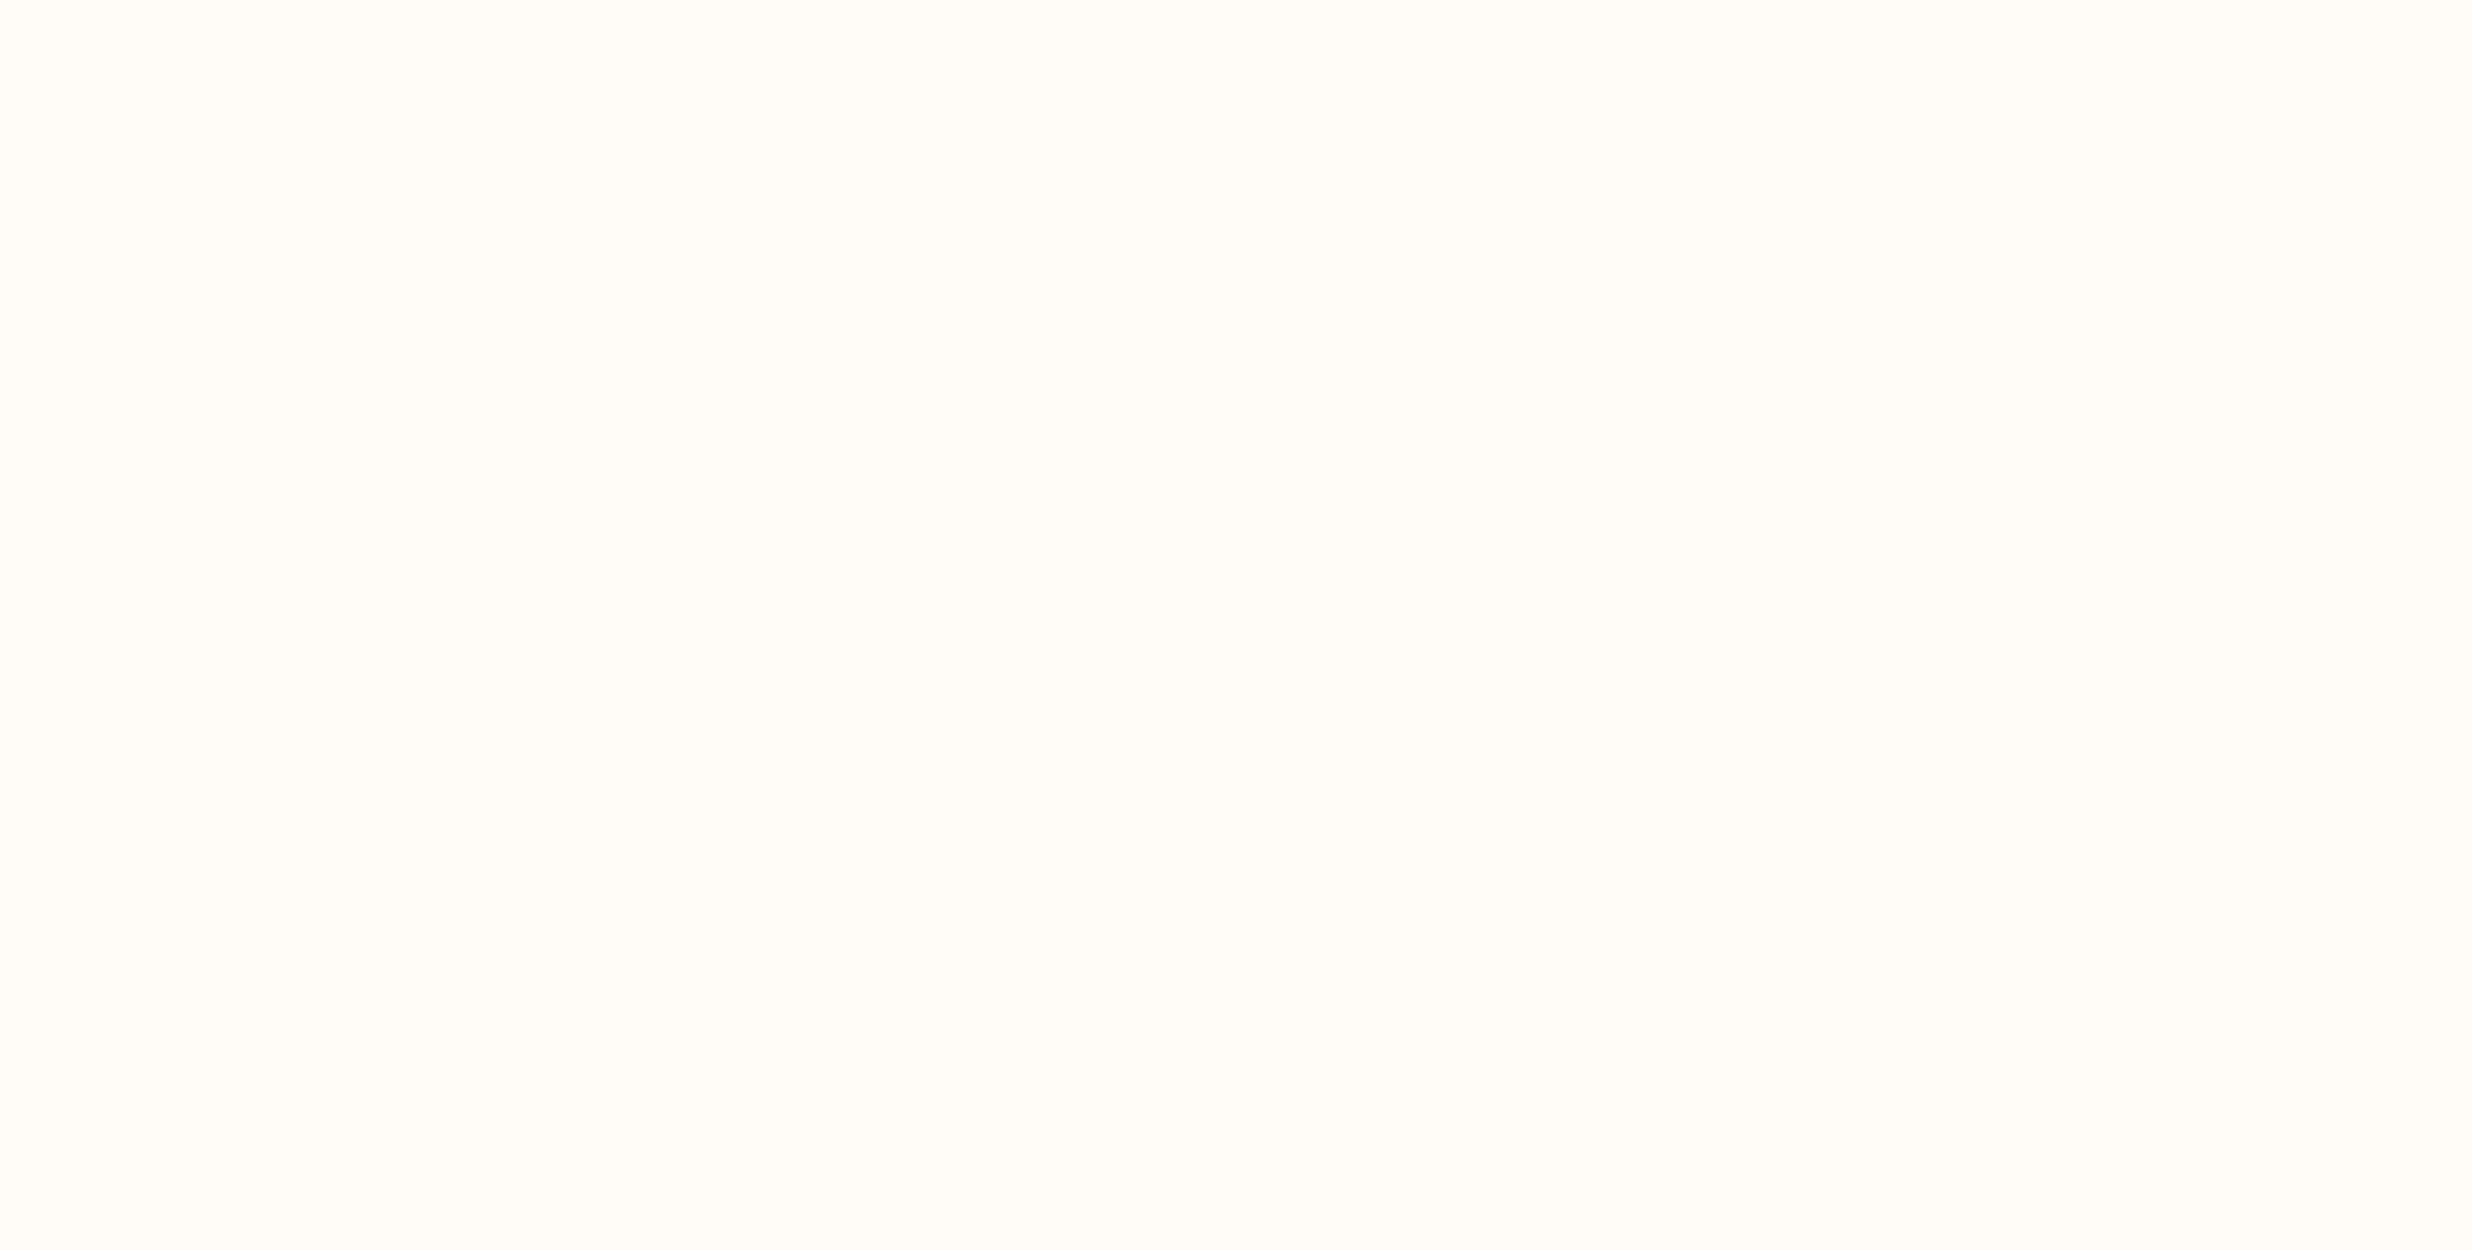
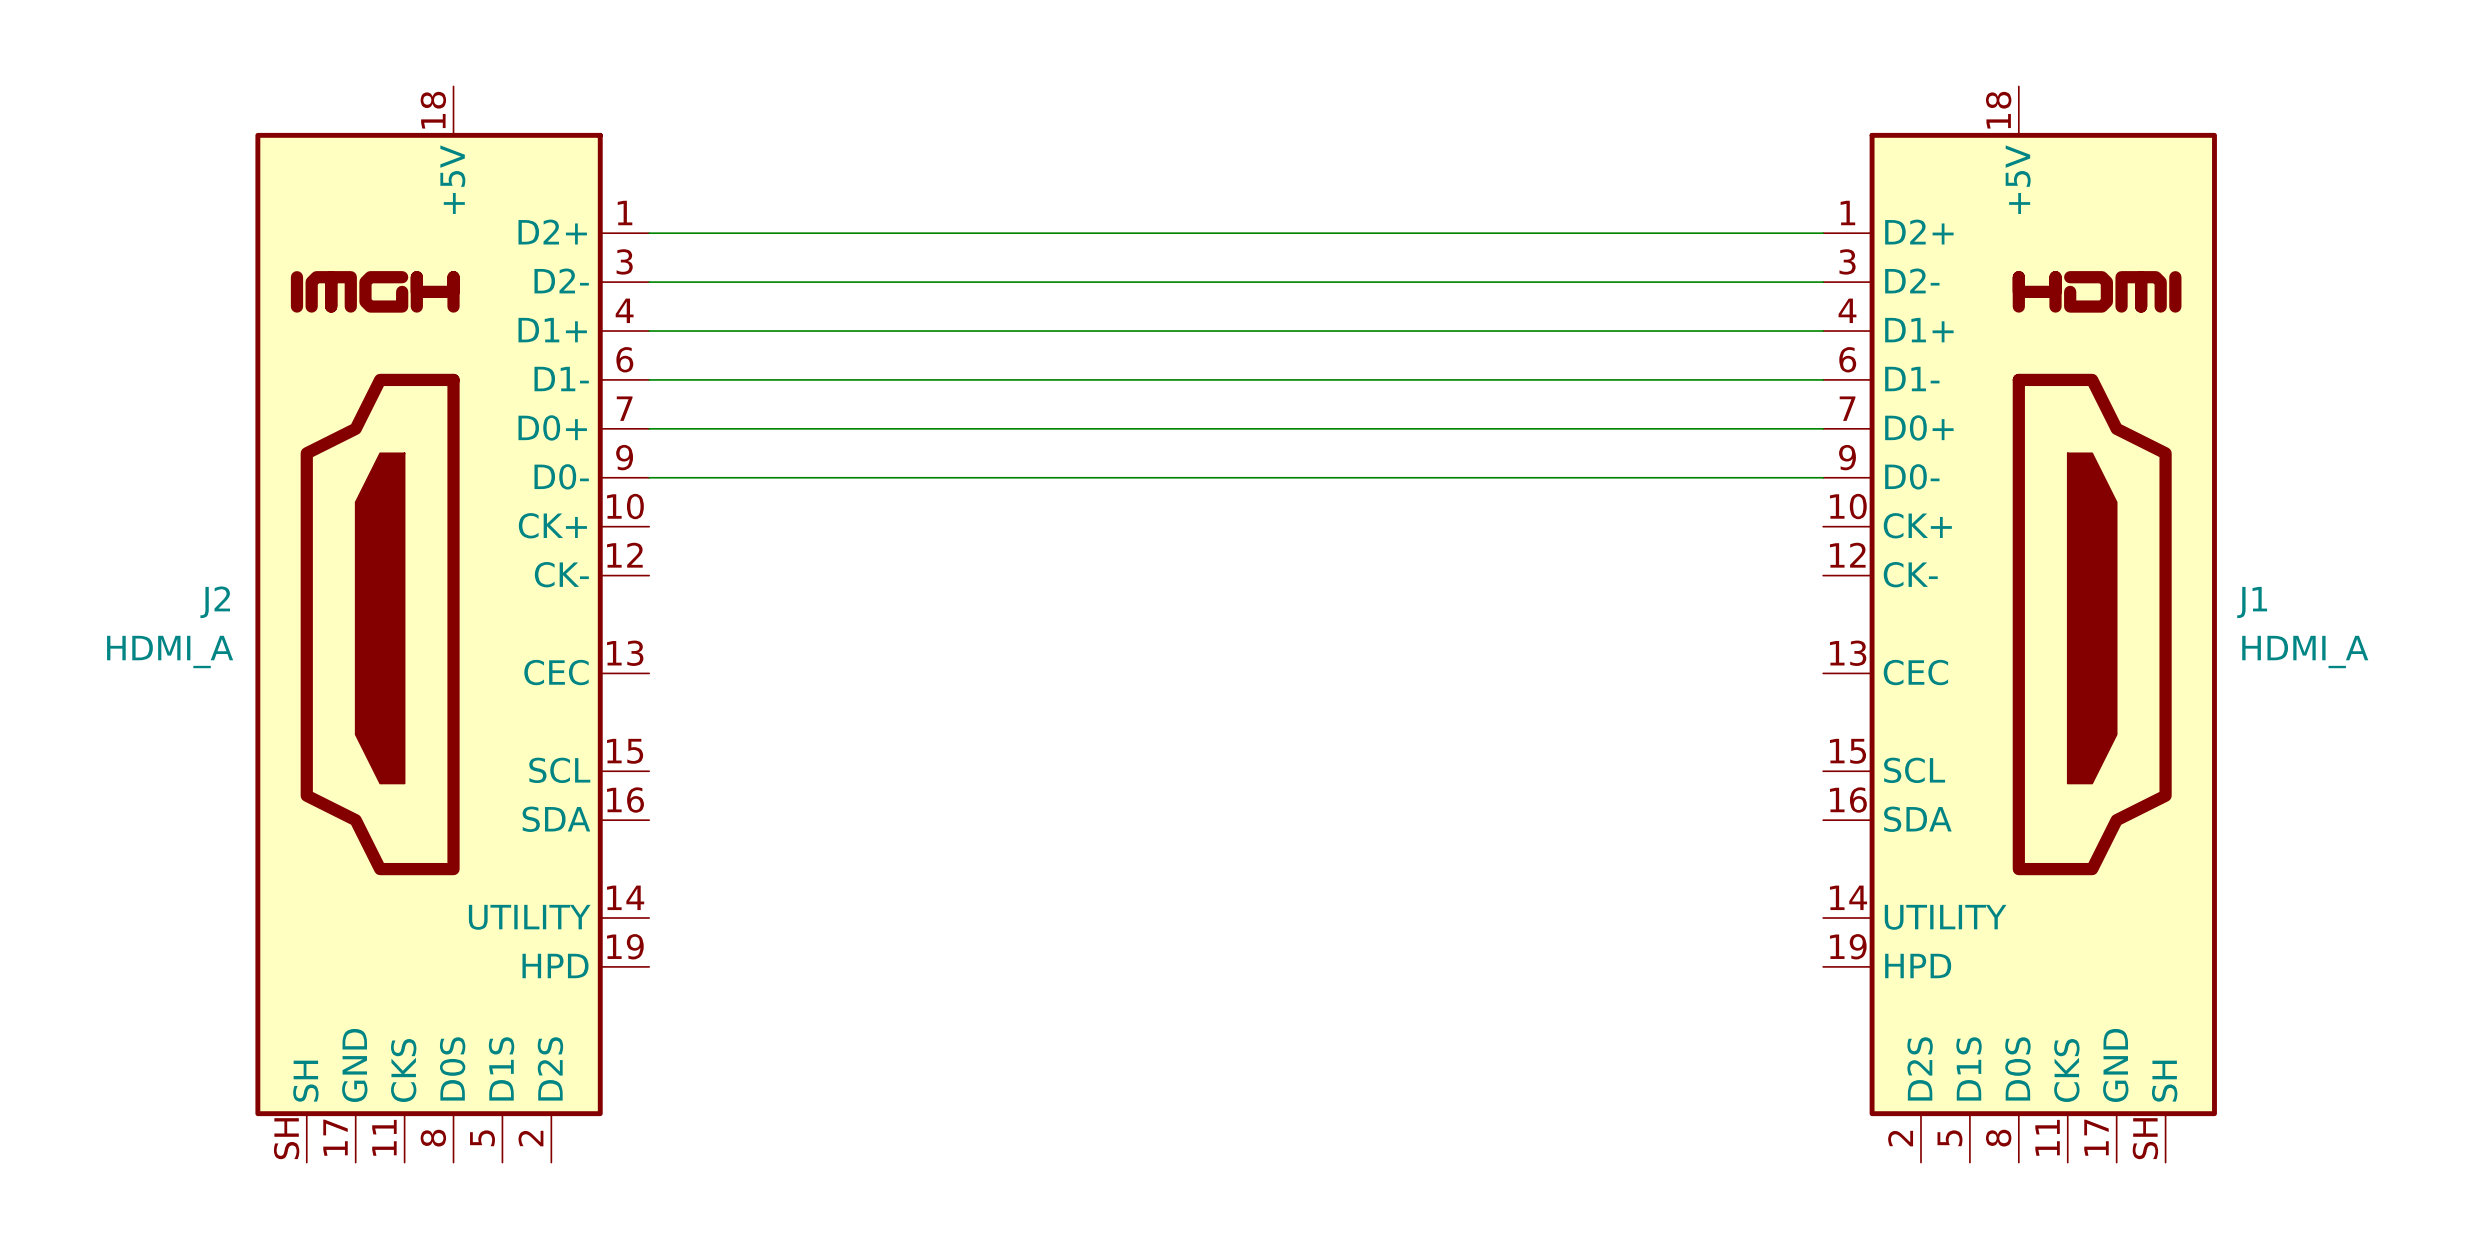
wire: none -> (649, 233) (1823, 233)
wire: none -> (649, 282) (1823, 282)
wire: none -> (649, 331) (1823, 331)
wire: none -> (649, 379) (1823, 379)
wire: none -> (649, 428) (1823, 428)
wire: none -> (649, 477) (1823, 477)
J2: none -> HDMI_A (452, 624)
J1: none -> HDMI_A (2020, 624)

